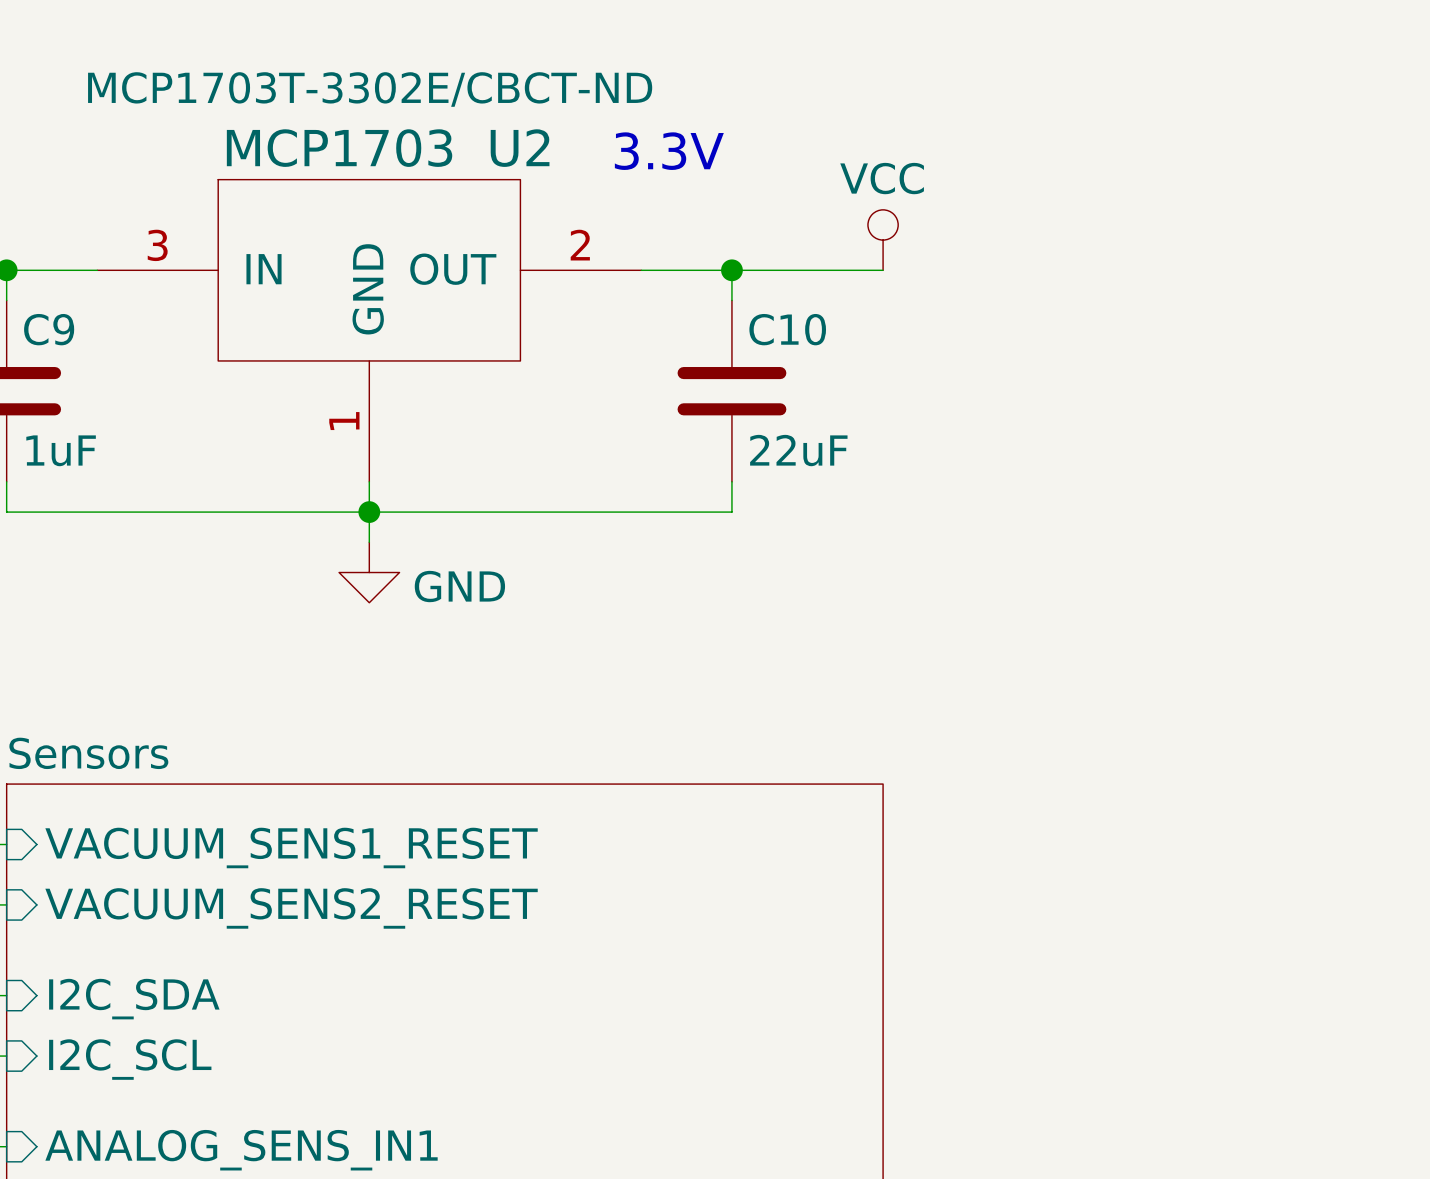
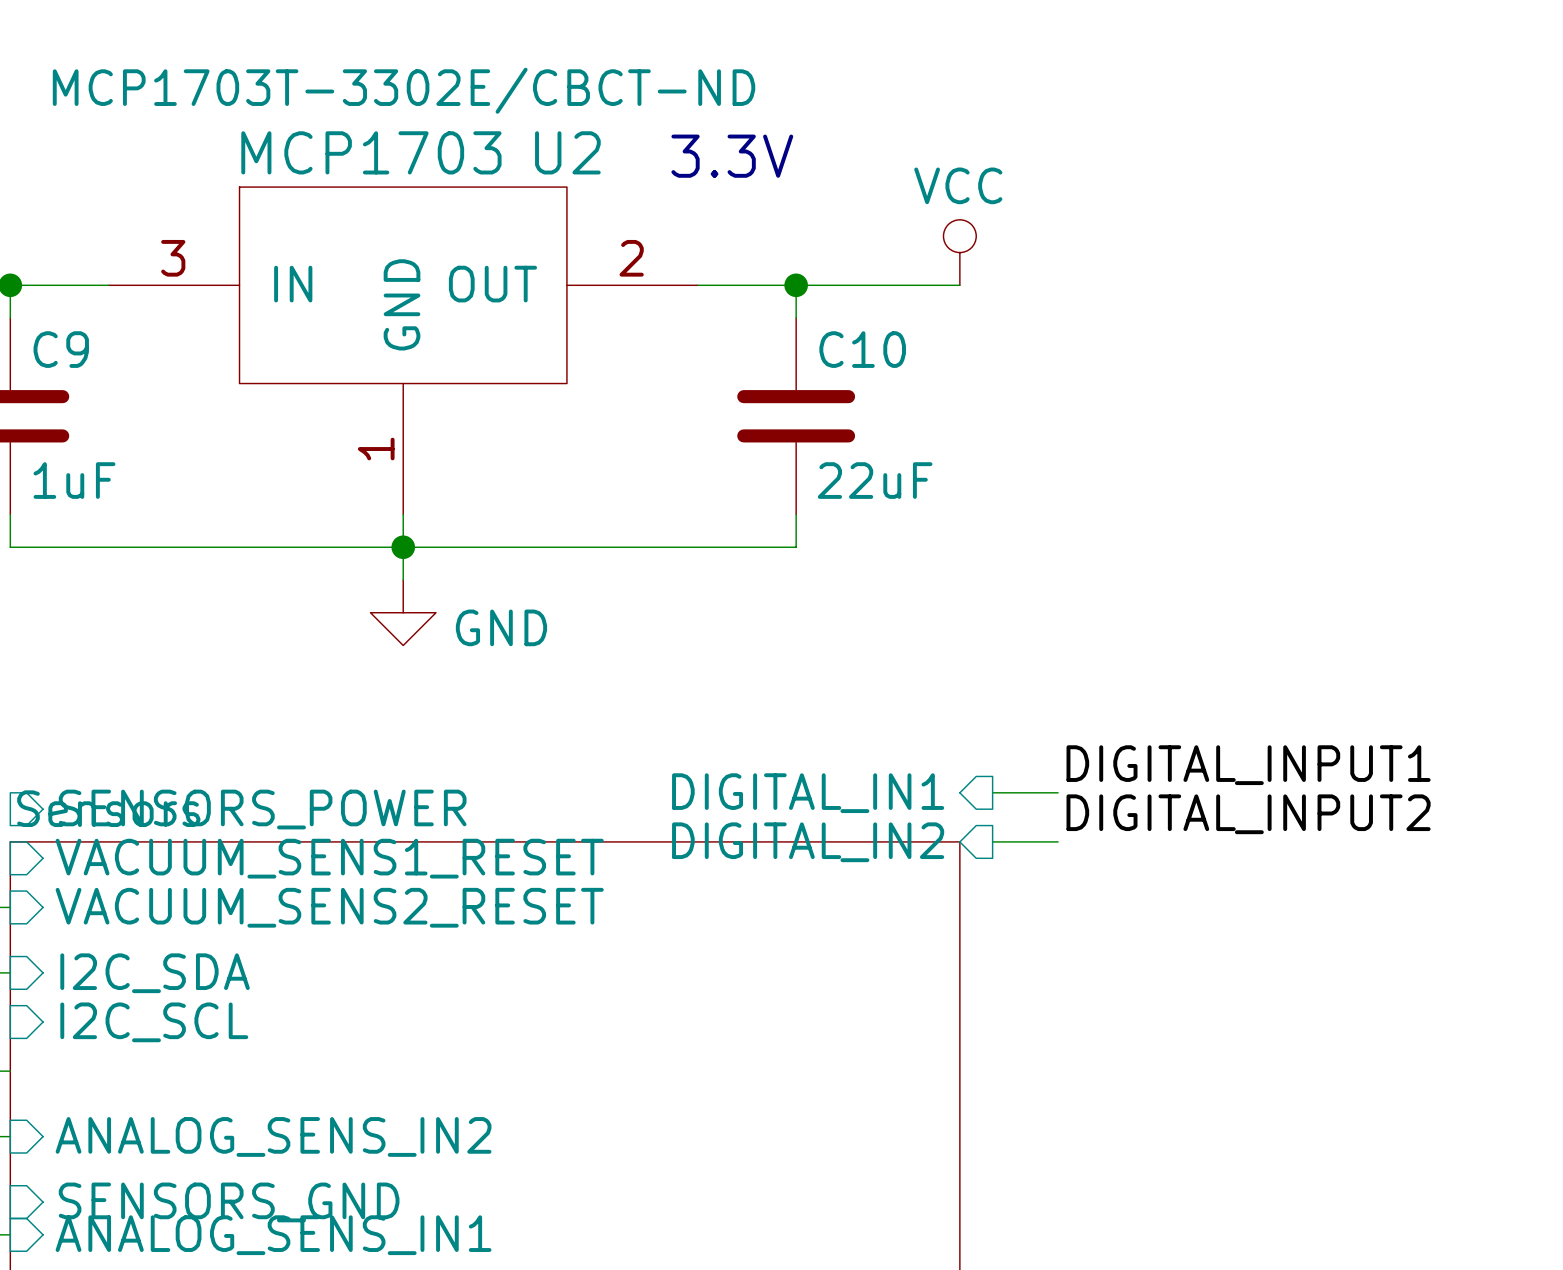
label: none -> DIGITAL_INPUT1 (1248, 765)
wire: none -> (992, 792) (1058, 792)
sheet pin: none -> DIGITAL_IN1 (808, 793)
sheet pin: none -> SENSORS_POWER (262, 809)
label: none -> DIGITAL_INPUT2 (1248, 814)
wire: none -> (992, 841) (1058, 841)
sheet pin: none -> DIGITAL_IN2 (808, 842)
sheet pin: none -> VACUUM_SENS1_RESET (329, 858)
sheet pin: VACUUM_SENS1_RESET (291, 847) -> VACUUM_SENS2_RESET (329, 907)
sheet pin: VACUUM_SENS2_RESET (291, 908) -> I2C_SDA (155, 973)
sheet pin: I2C_SDA (134, 999) -> I2C_SCL (154, 1022)
sheet pin: I2C_SCL (130, 1059) -> ANALOG_SENS_IN2 (273, 1136)
sheet pin: none -> SENSORS_GND (229, 1202)

